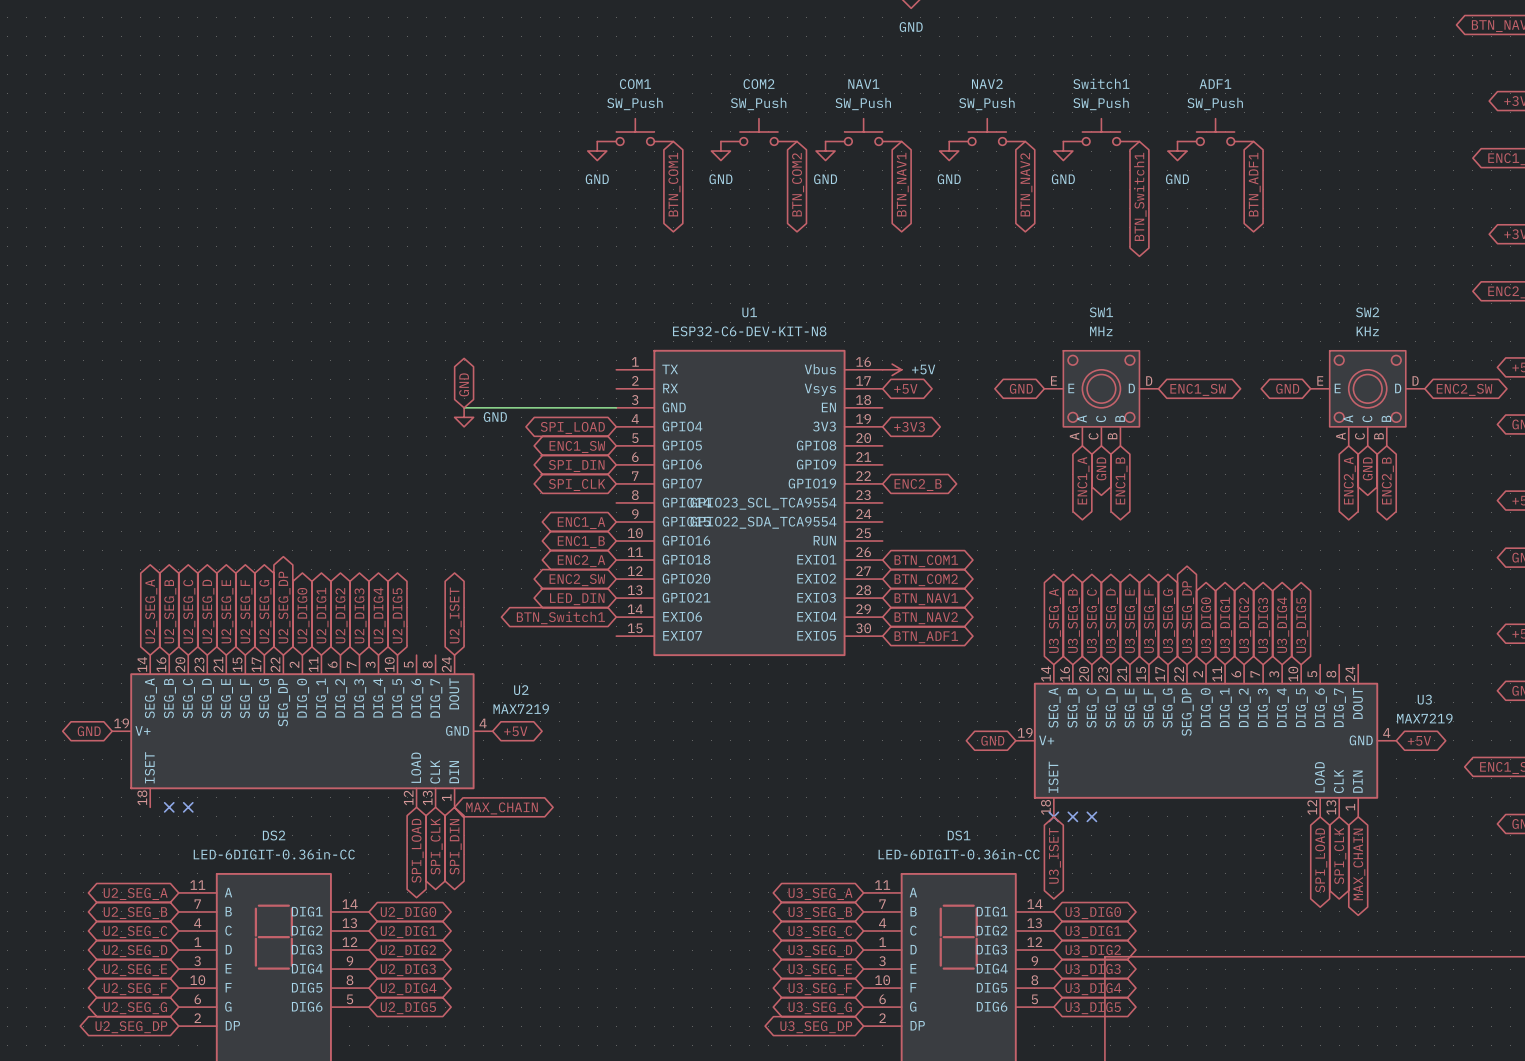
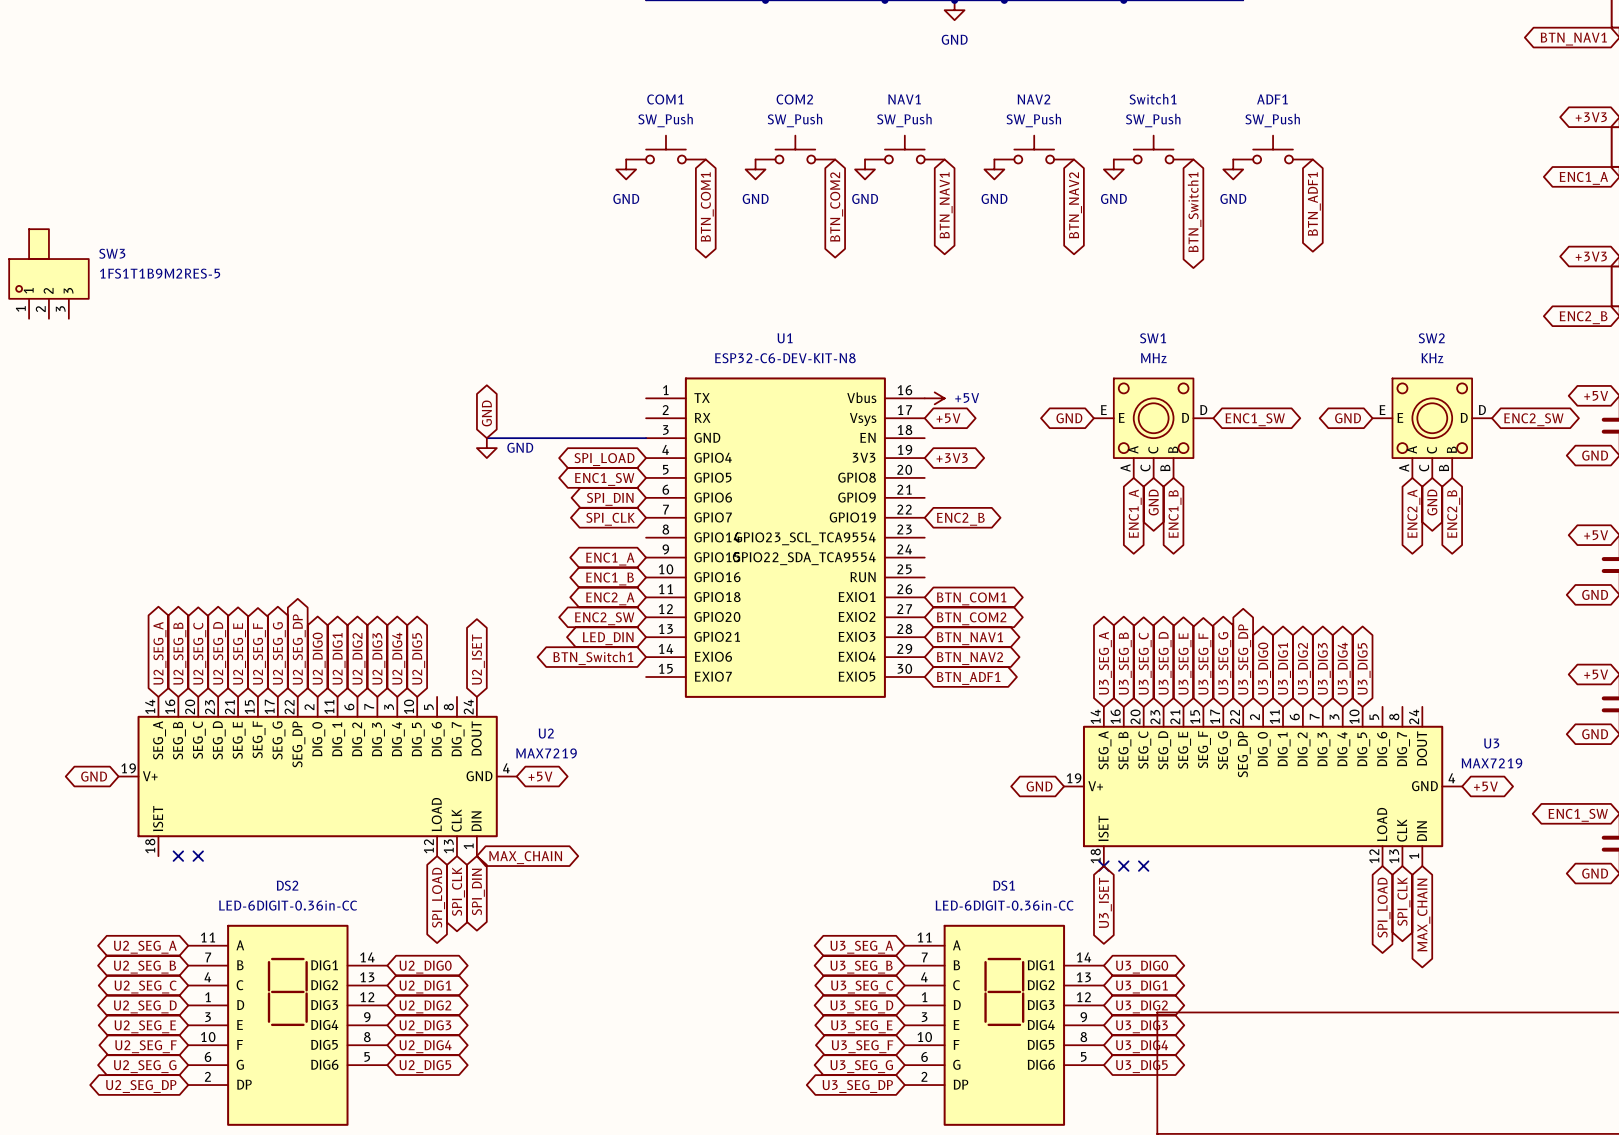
SW3: none -> 1FS1T1B9M2RES-5 (48, 273)

